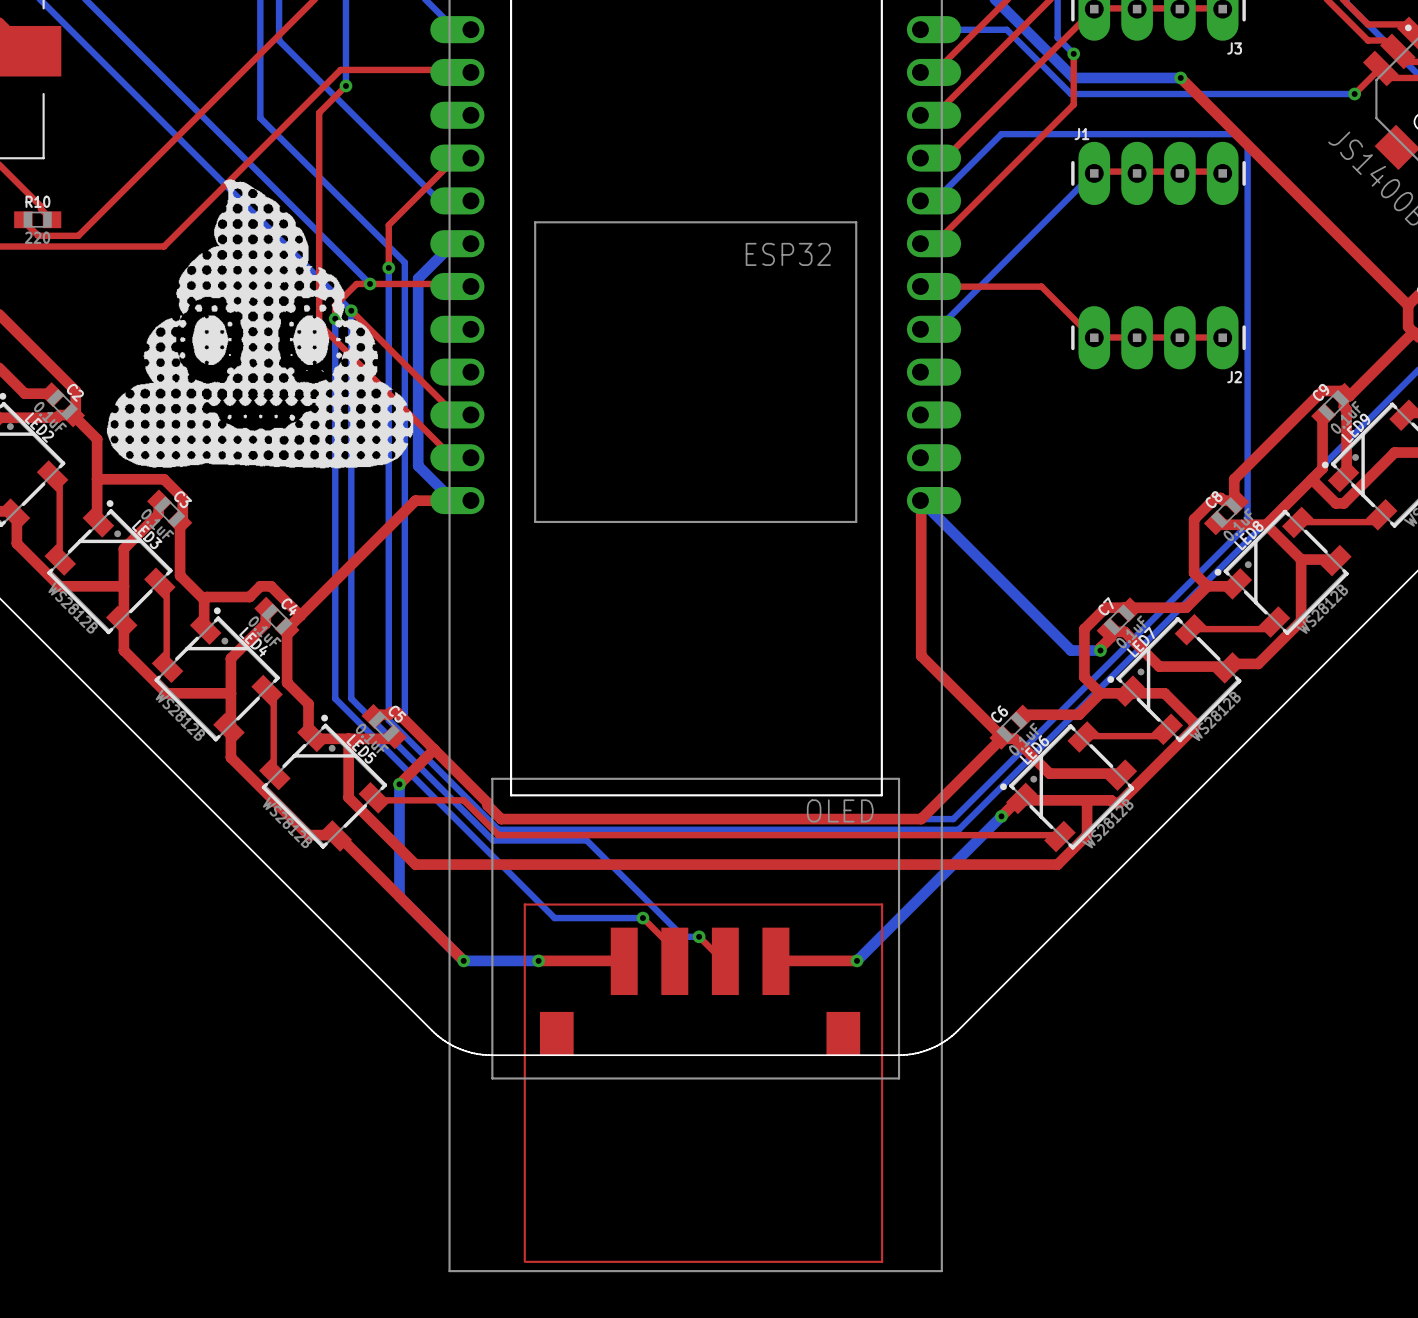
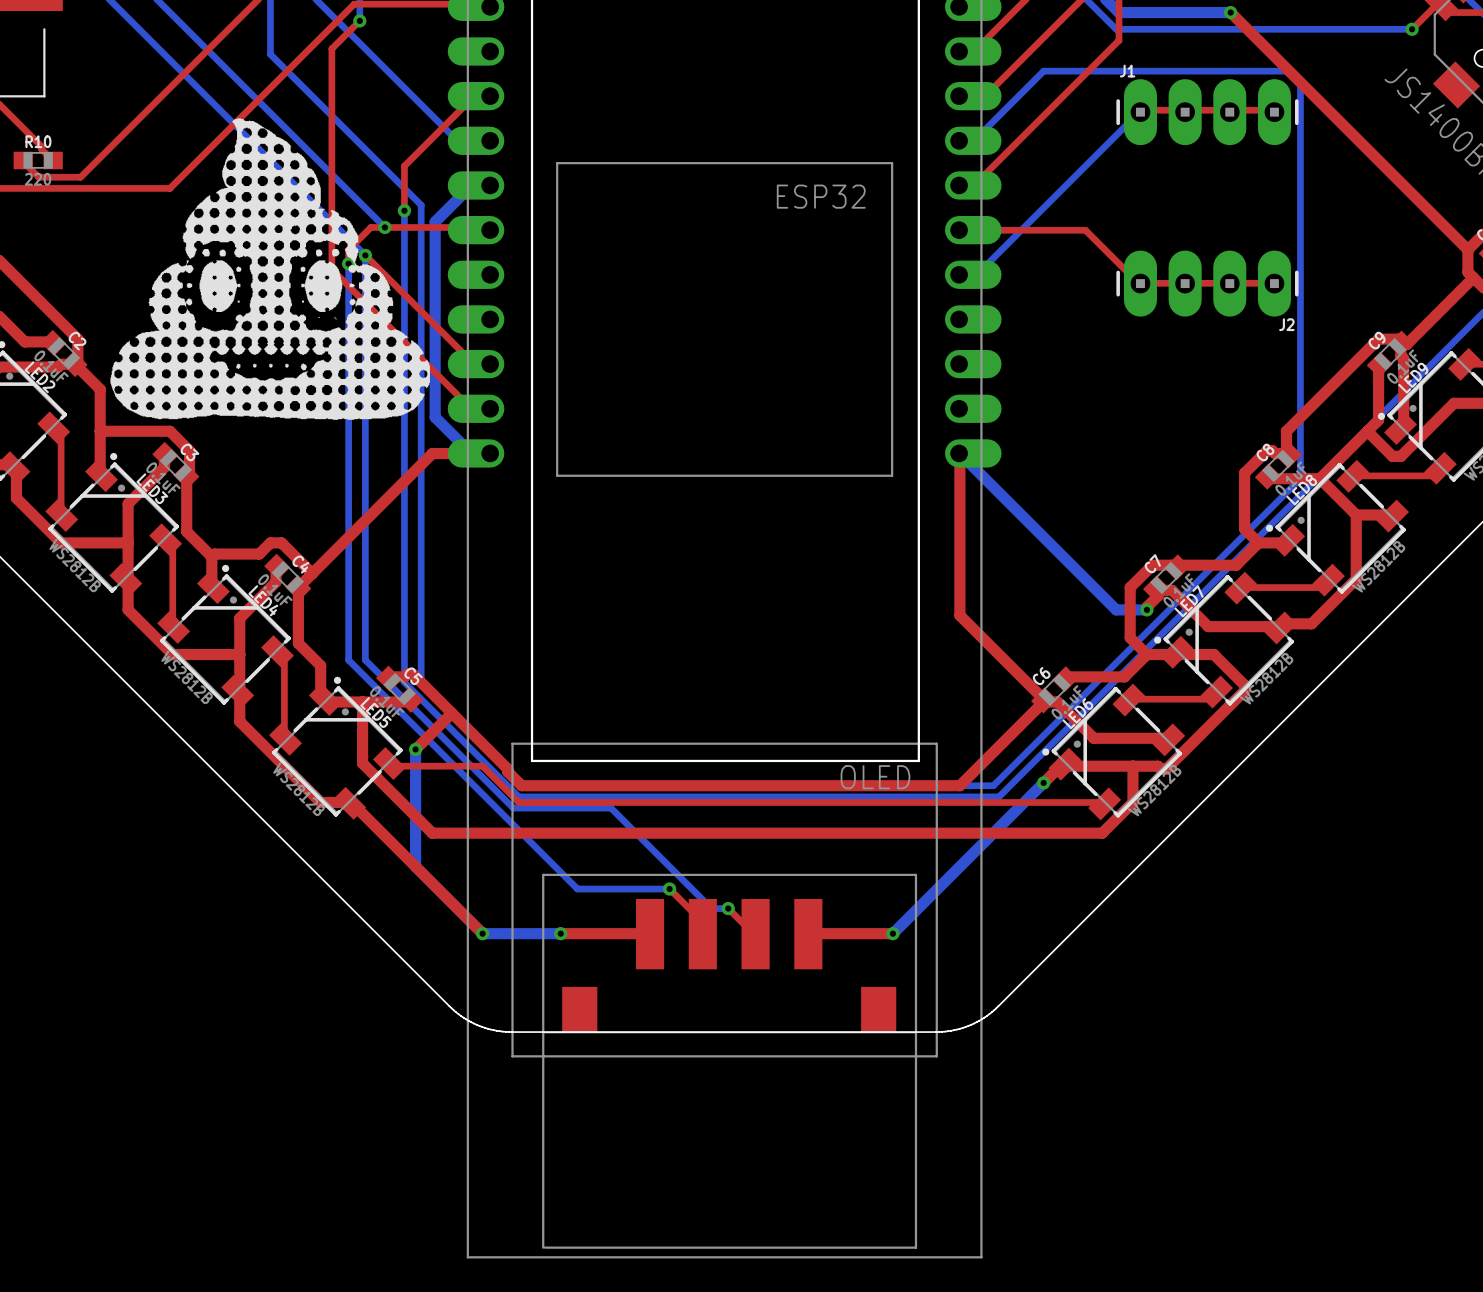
part footprint: [523, 903, 884, 1263] -> [542, 873, 918, 1249]

